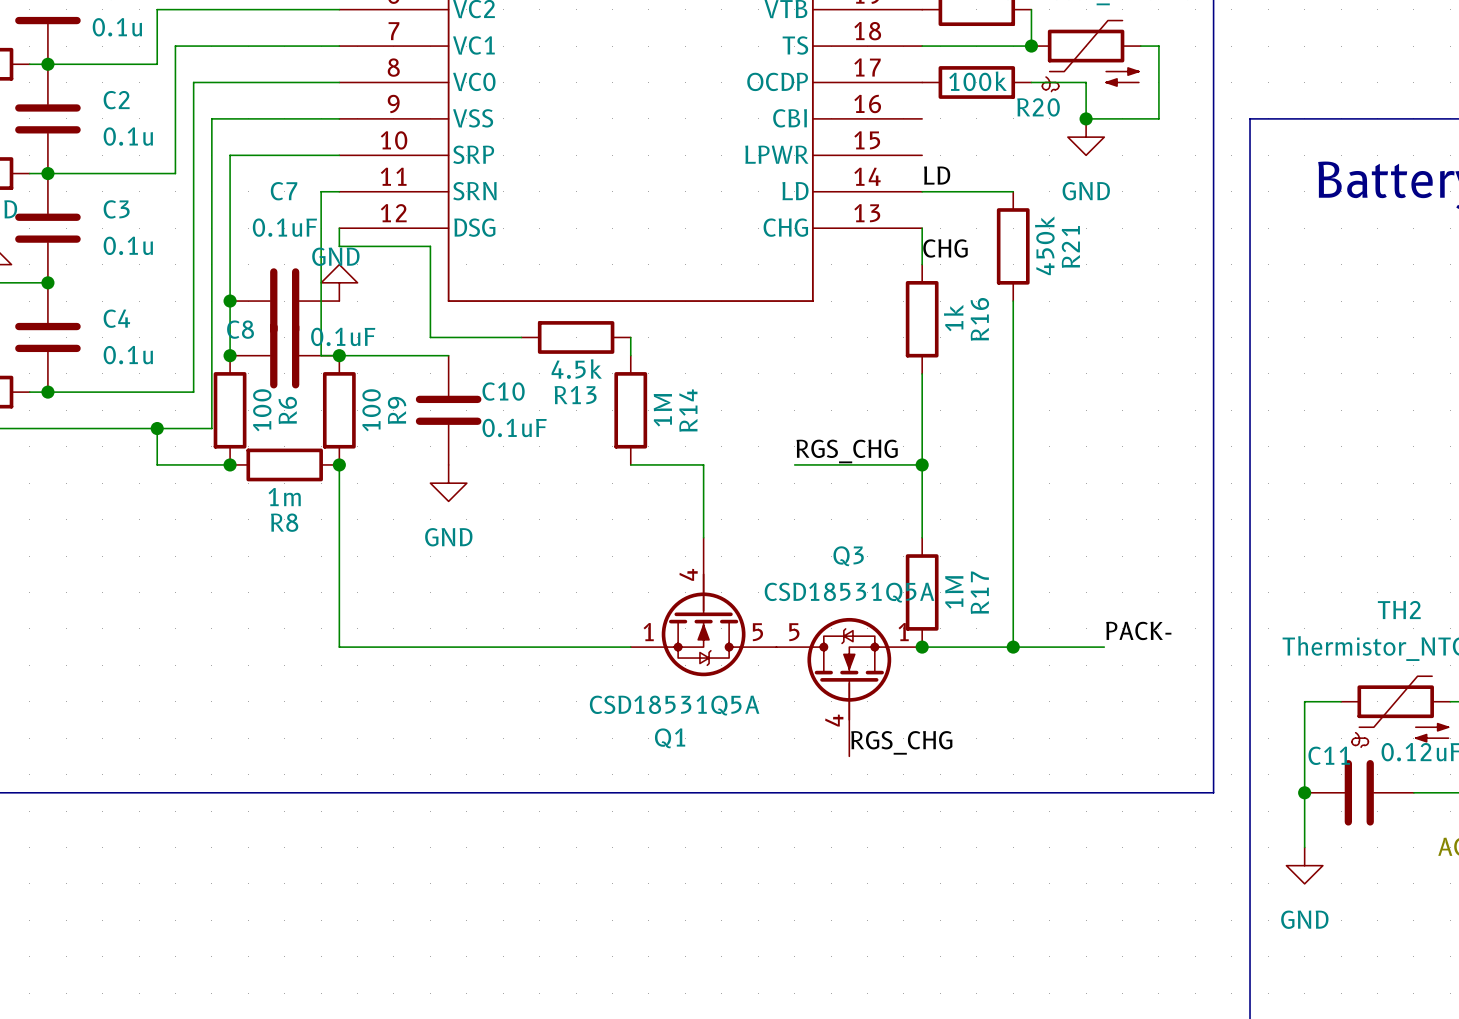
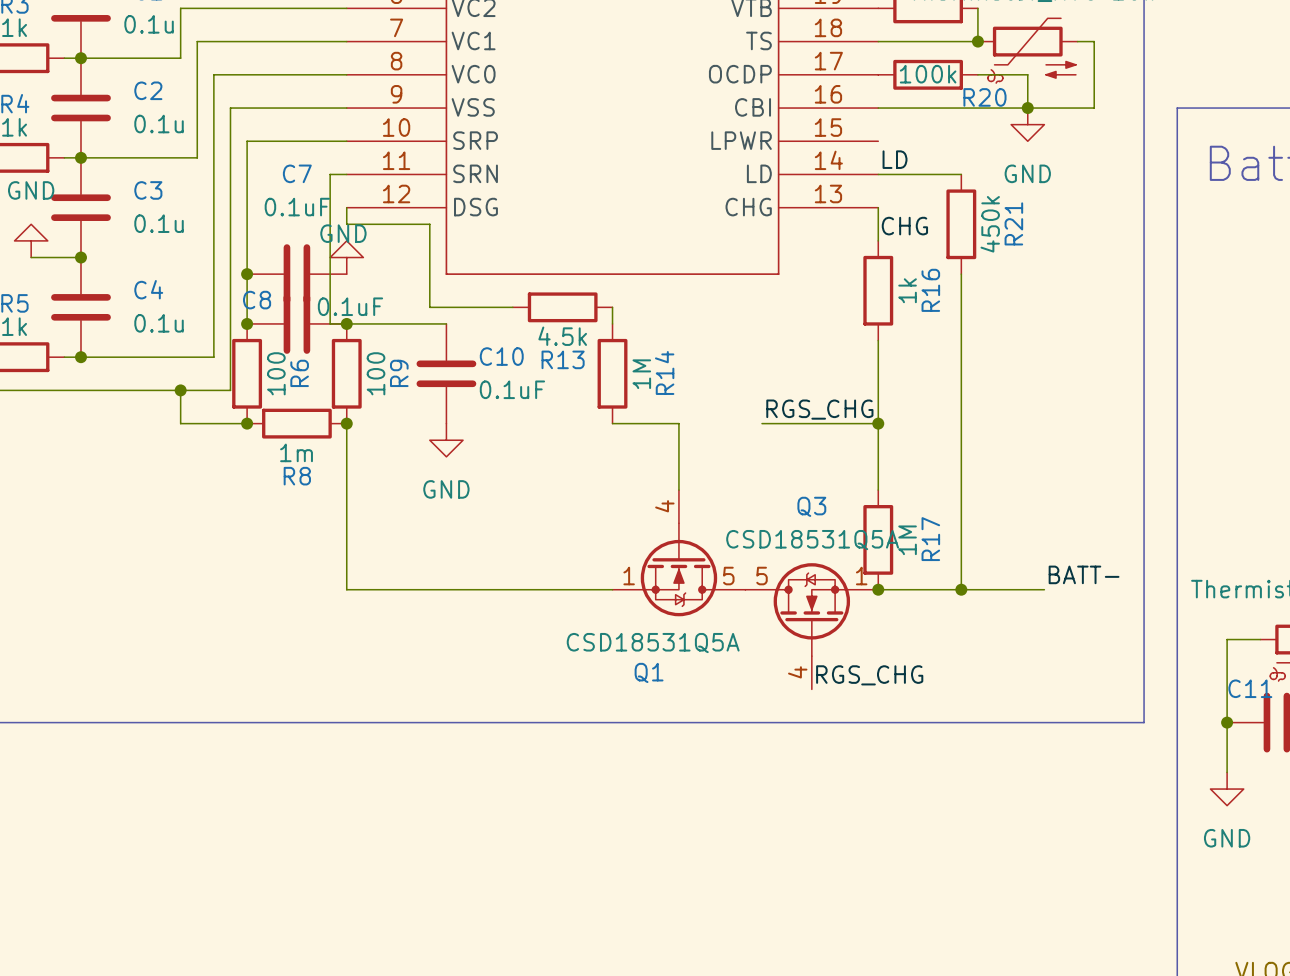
wire: none -> (878, 108) (1027, 108)
Q1 symbol: [630, 537, 777, 677] -> [612, 490, 746, 617]
Q3 symbol: [776, 617, 923, 757] -> [745, 563, 879, 690]
label: PACK- (1138, 630) -> BATT- (1084, 574)

